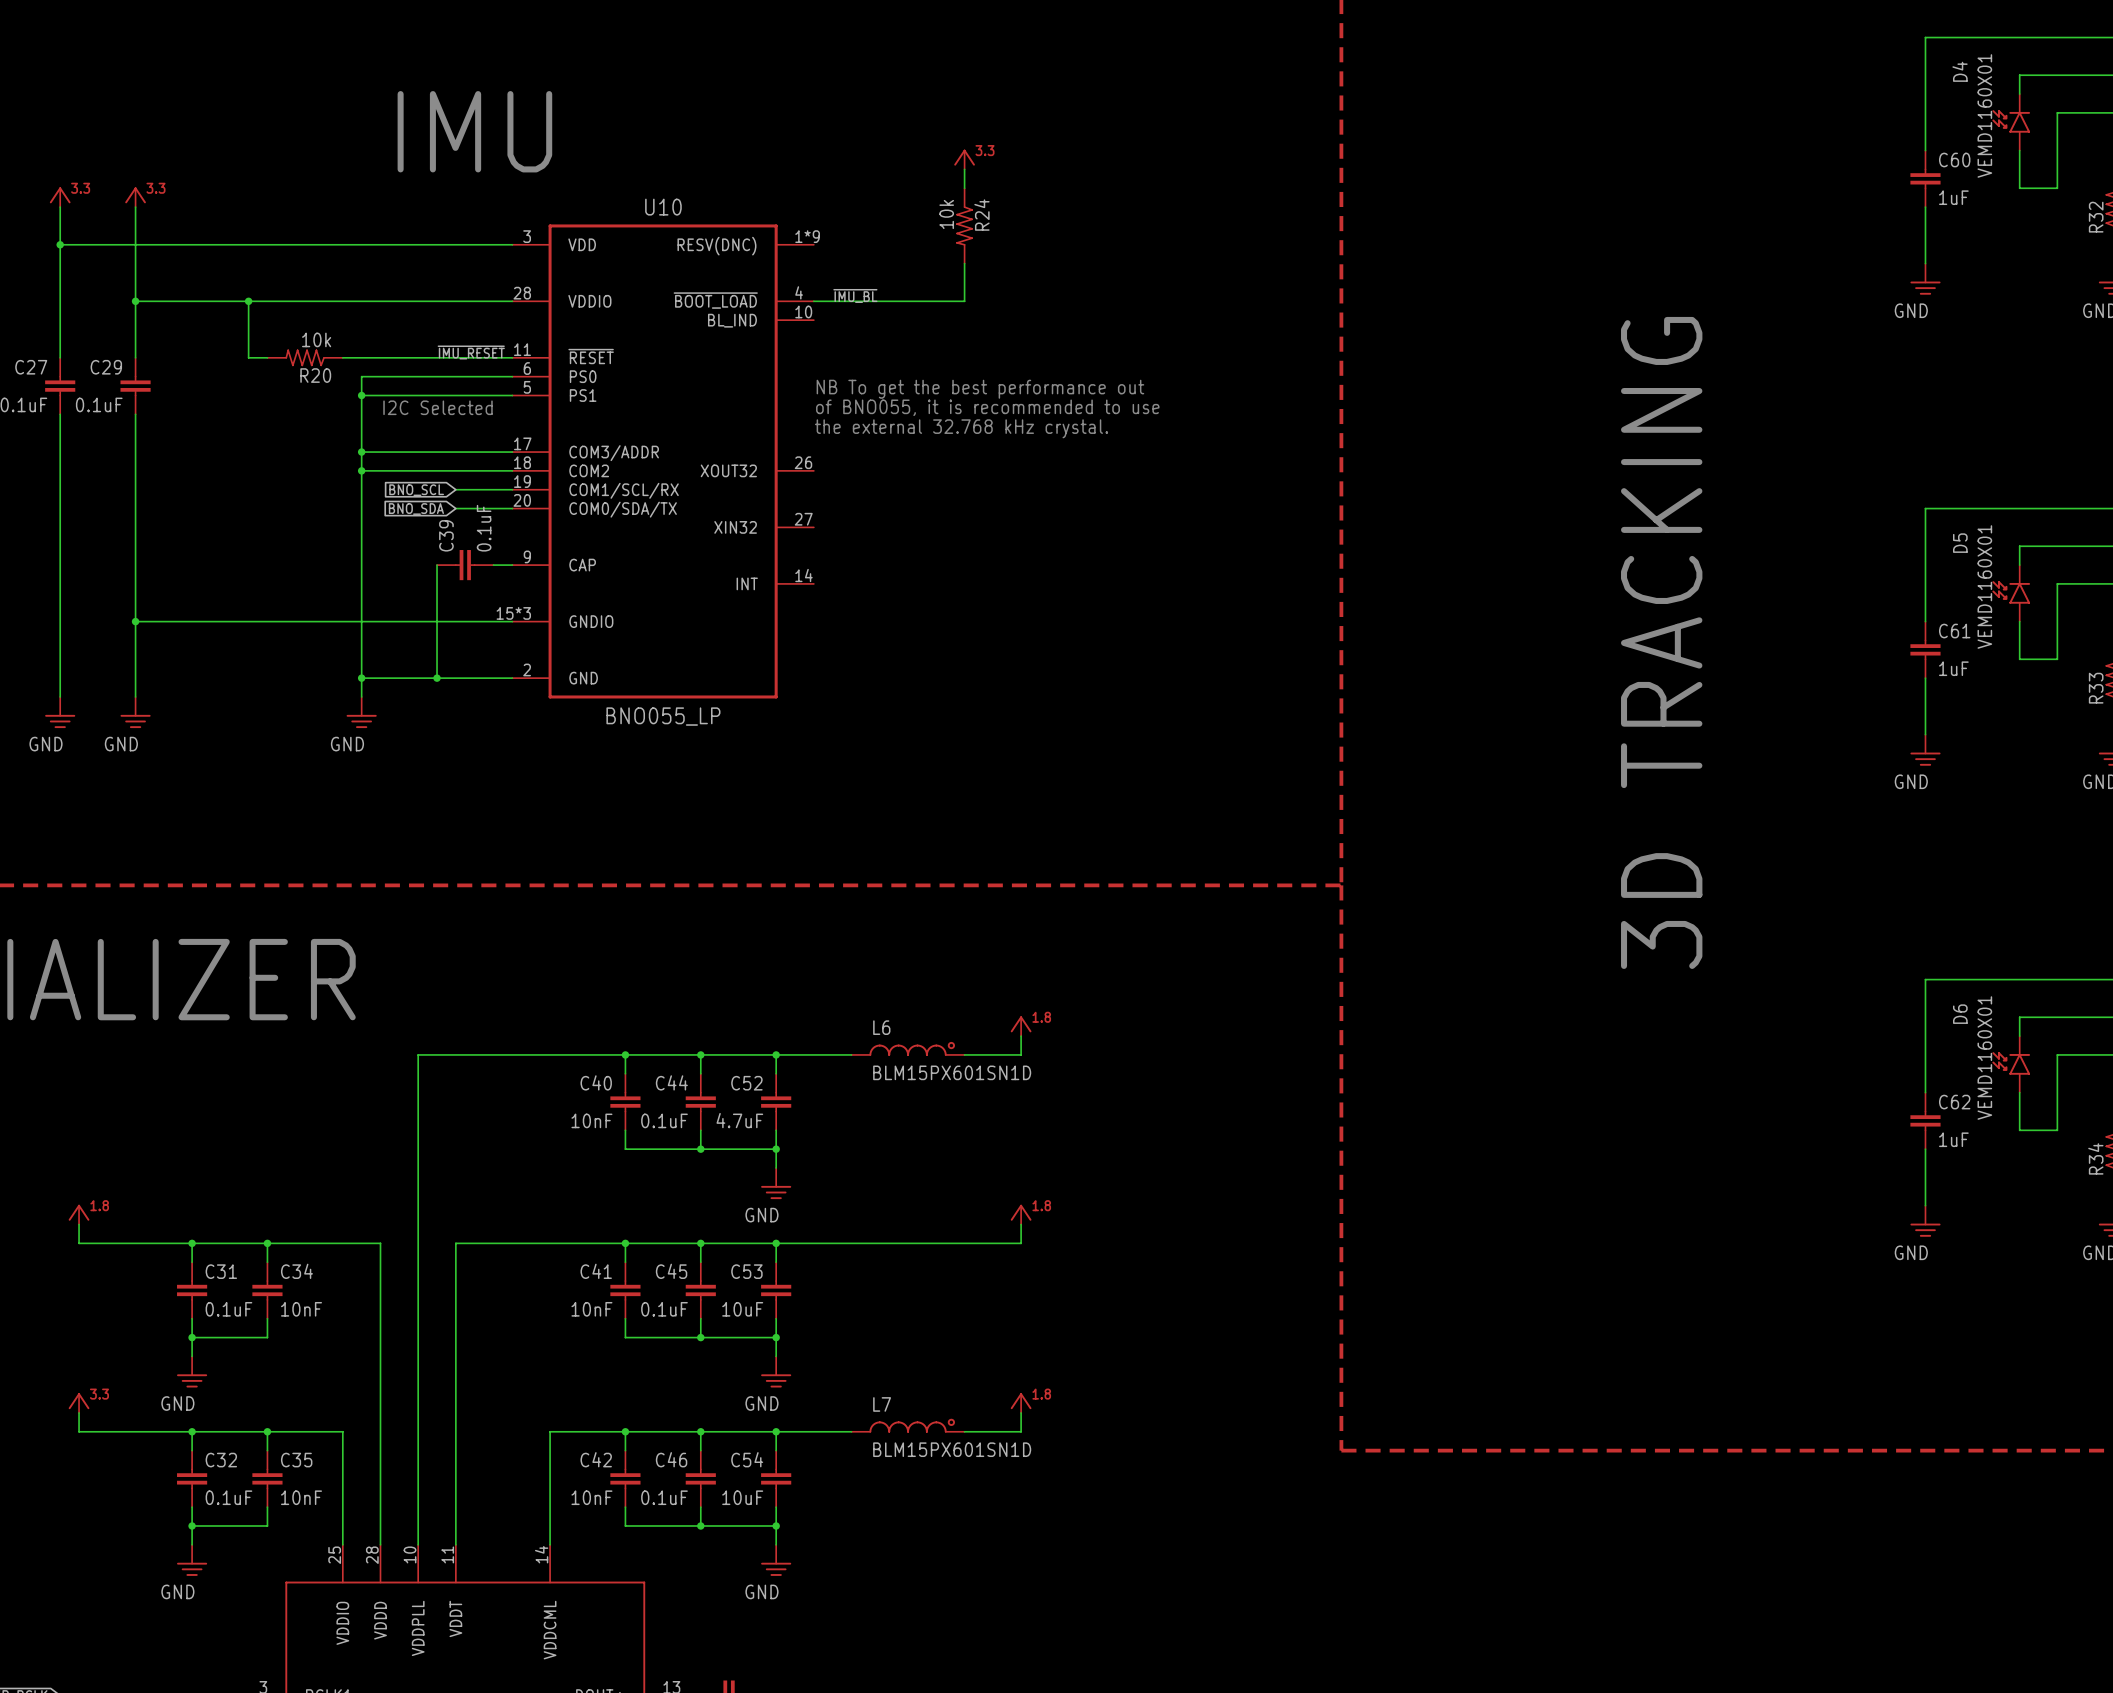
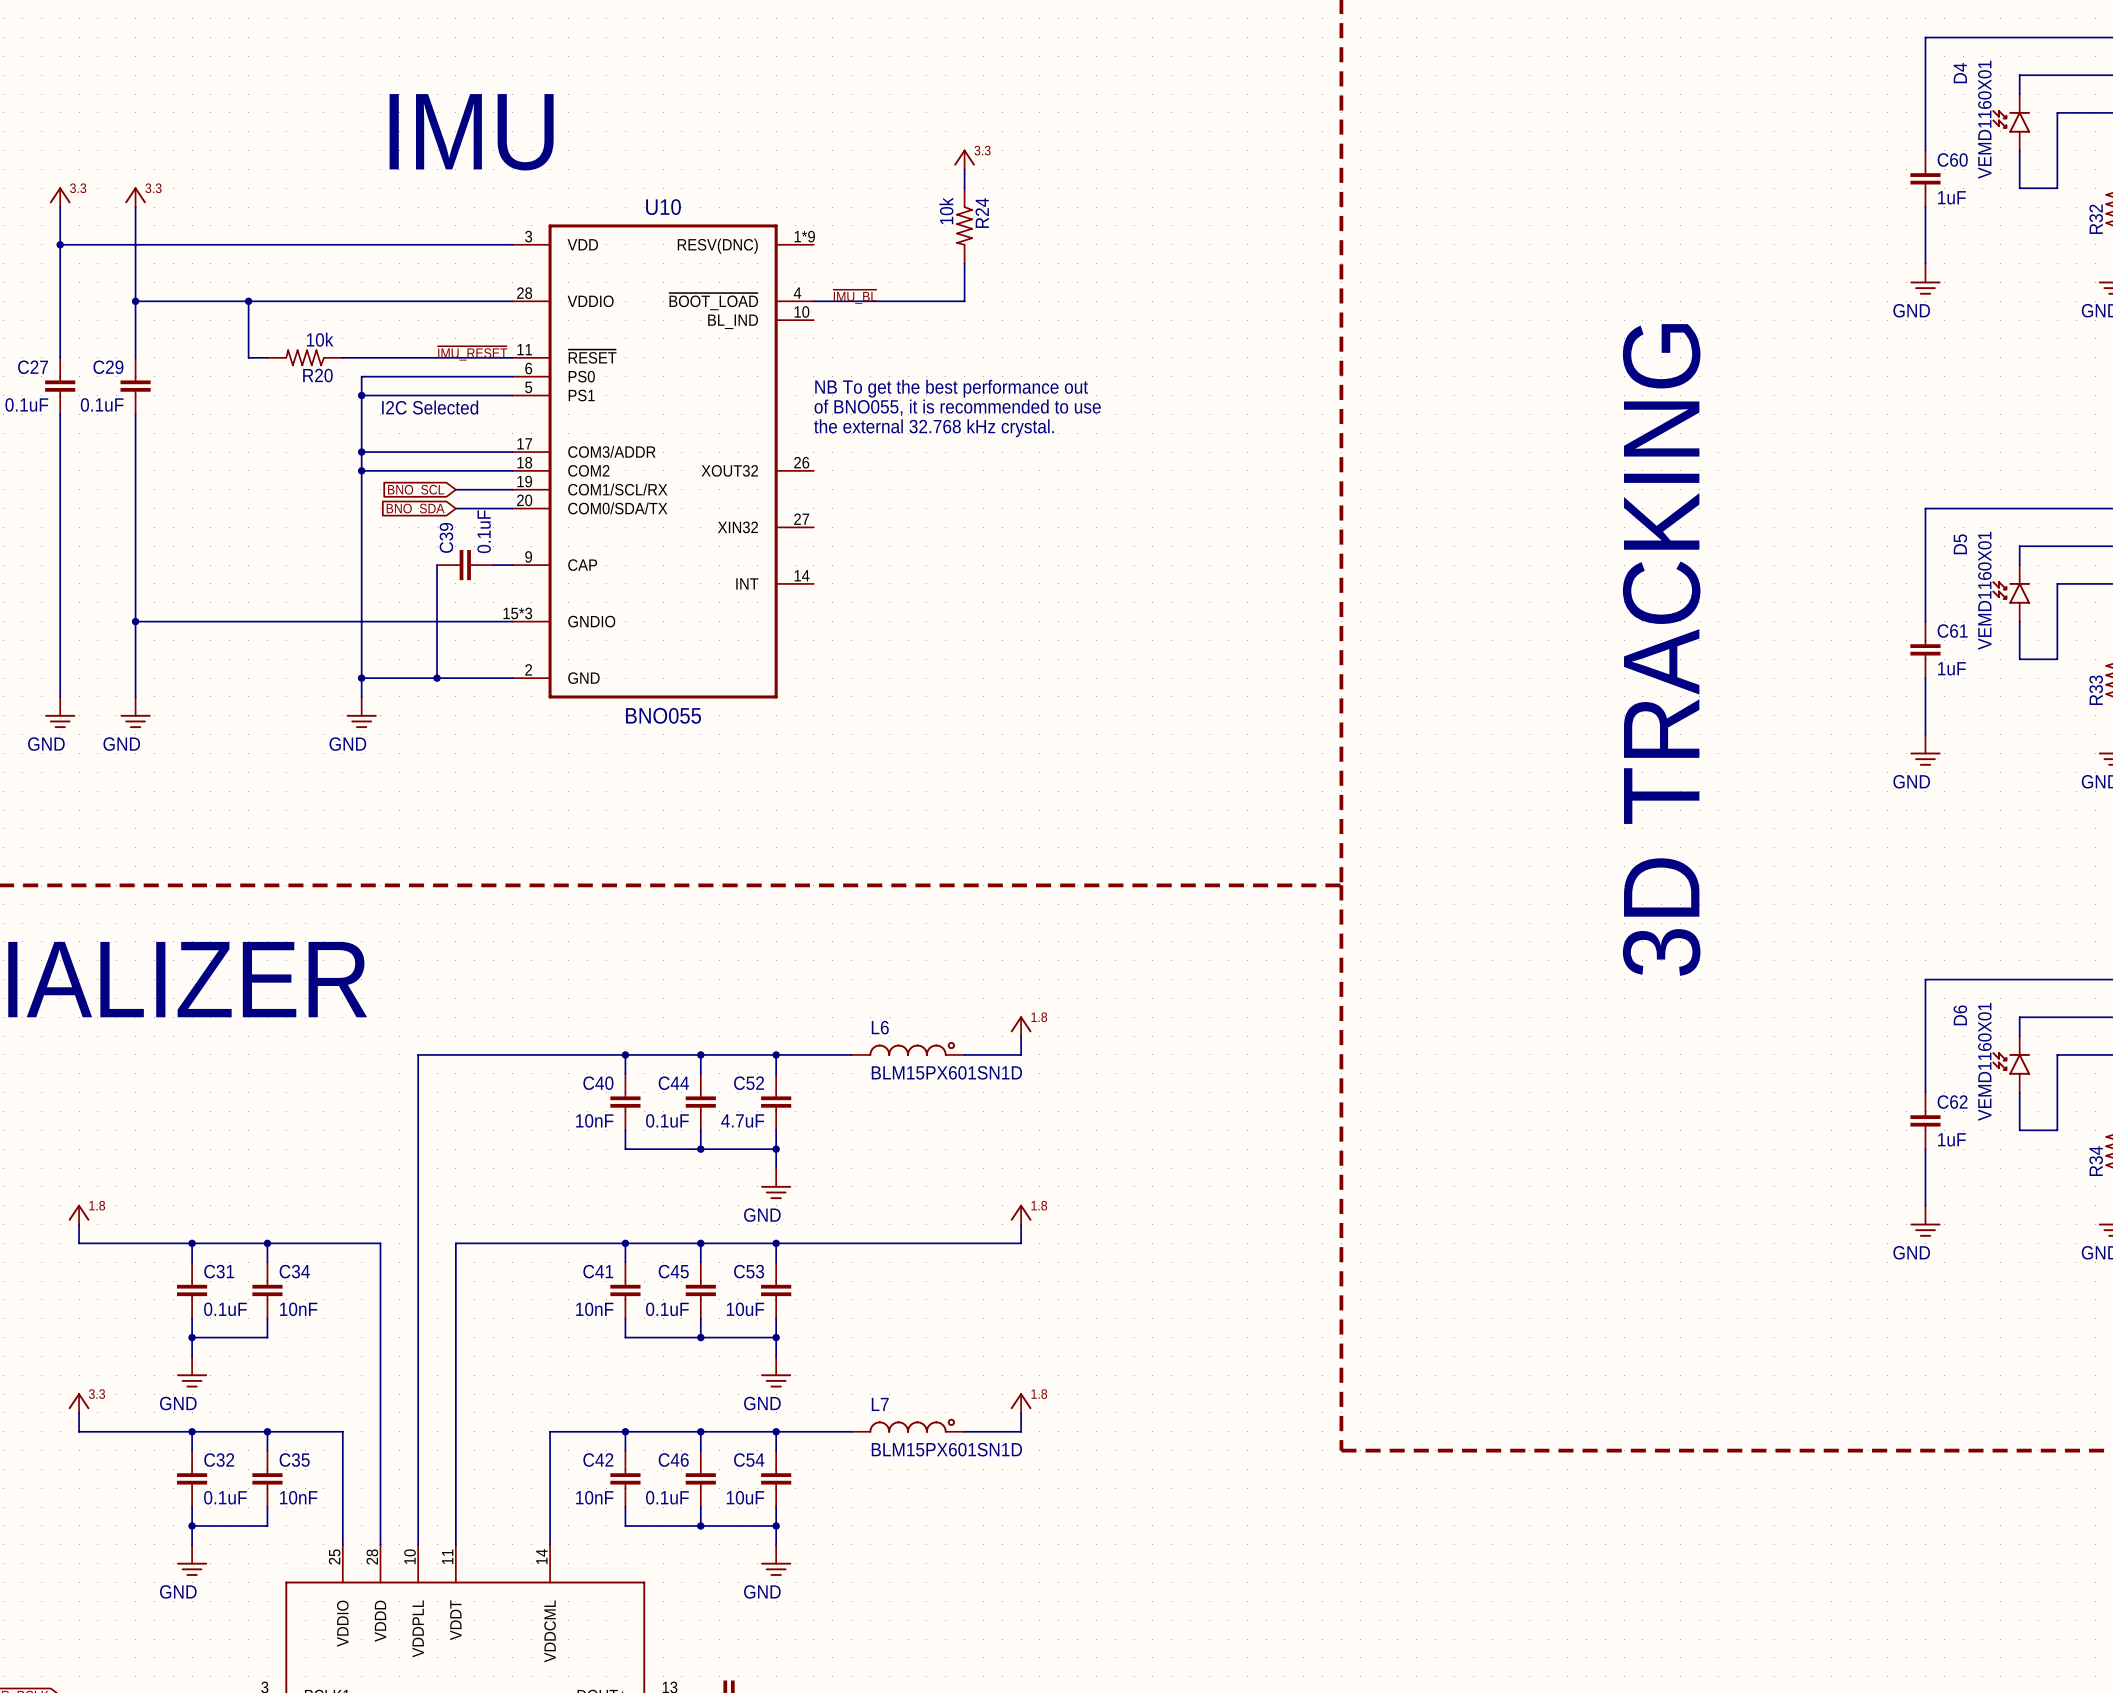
U10 value: BNO055_LP (663, 716) -> BNO055 (663, 715)

